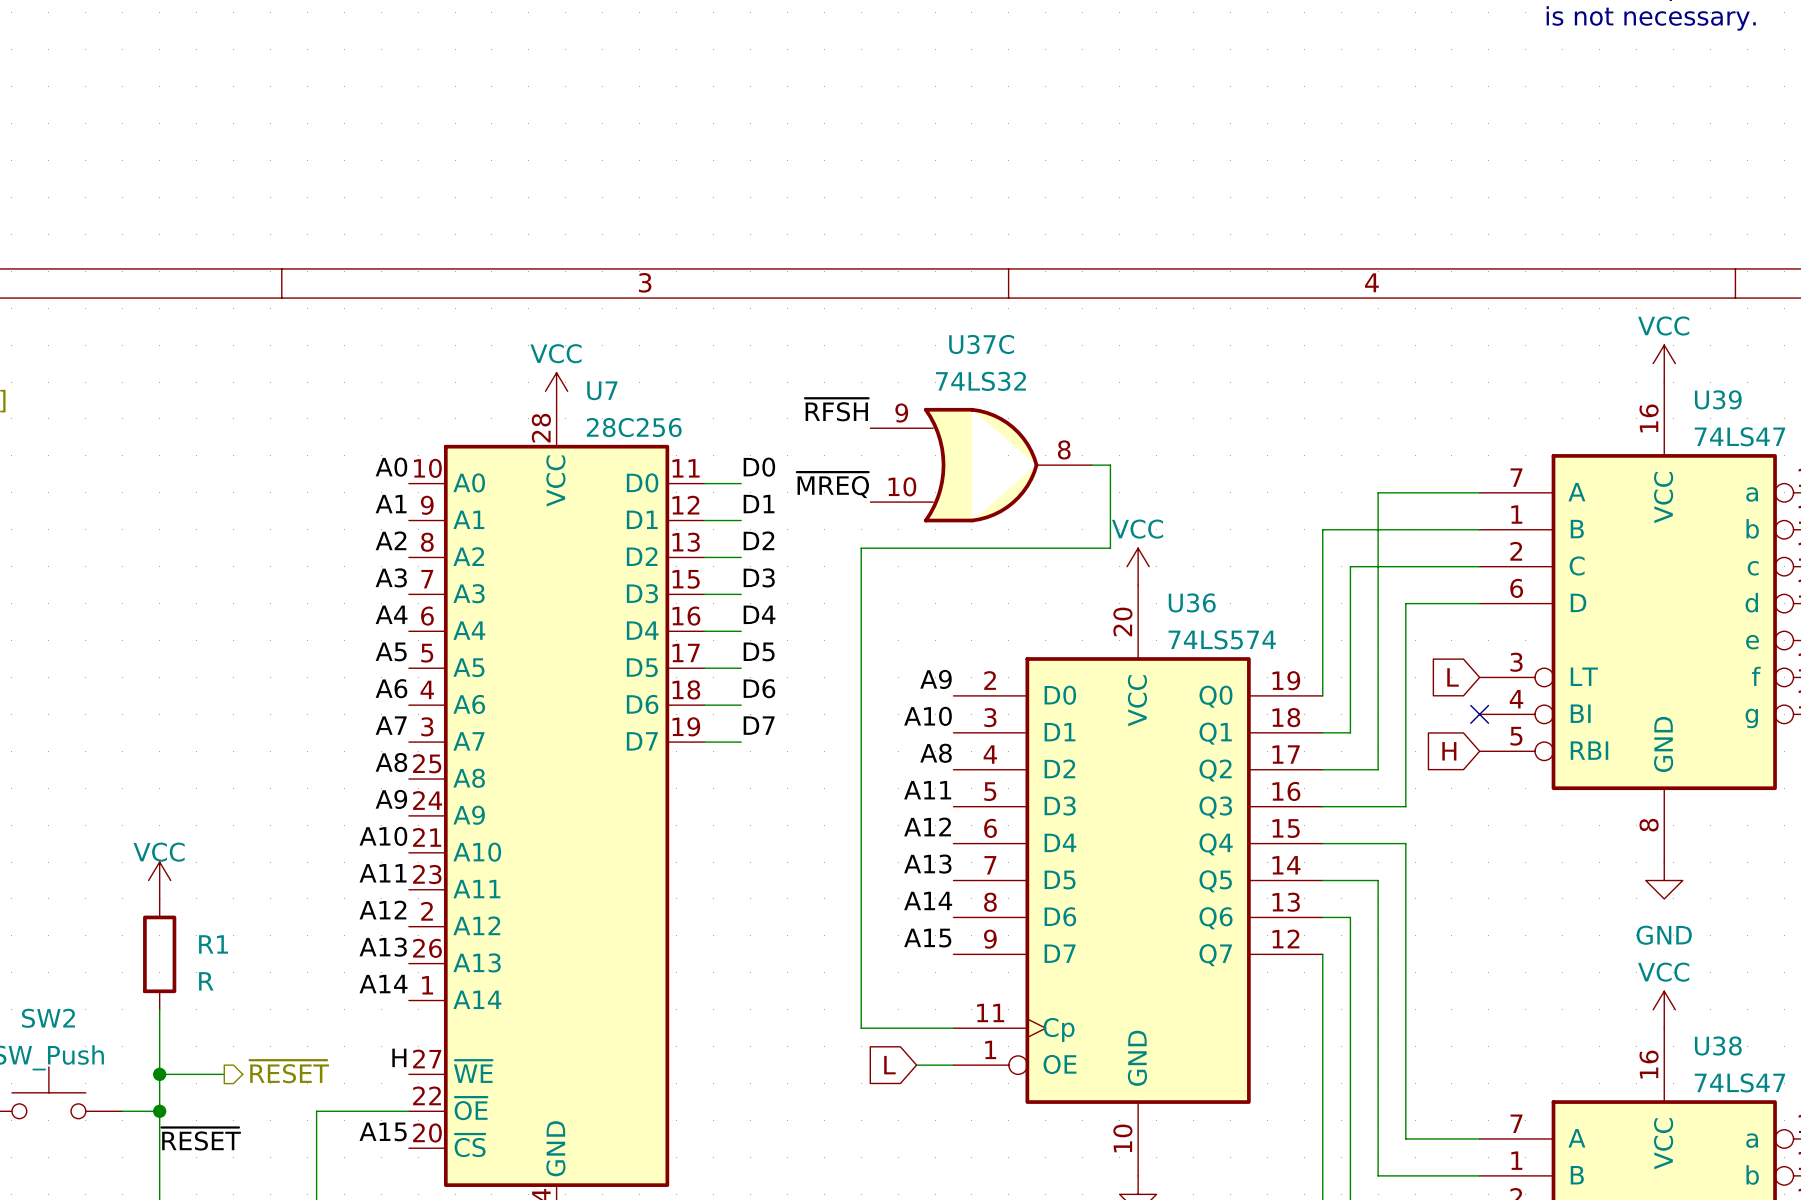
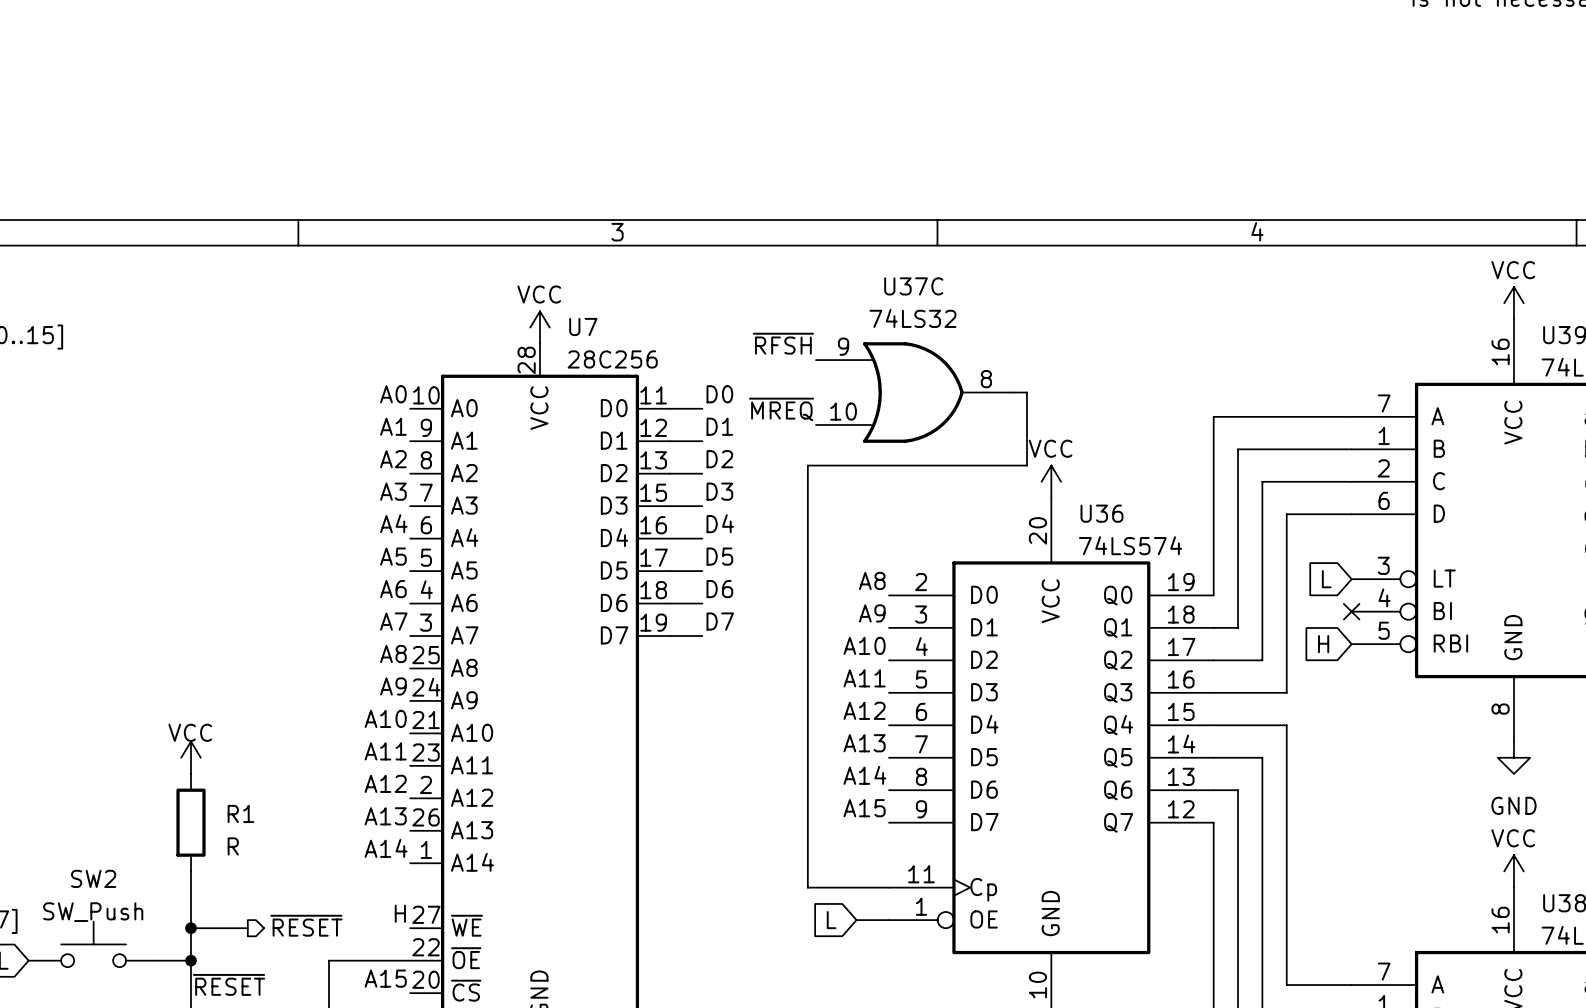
wire: (1378, 492) (1378, 566) (1350, 566) -> (1262, 416) (1213, 416) (1213, 449)
wire: (1322, 529) (1350, 529) -> (1238, 481) (1238, 449)
label: A9 (936, 679) -> A8 (872, 580)
label: A10 (927, 716) -> A9 (872, 613)
label: A8 (936, 753) -> A10 (864, 645)

